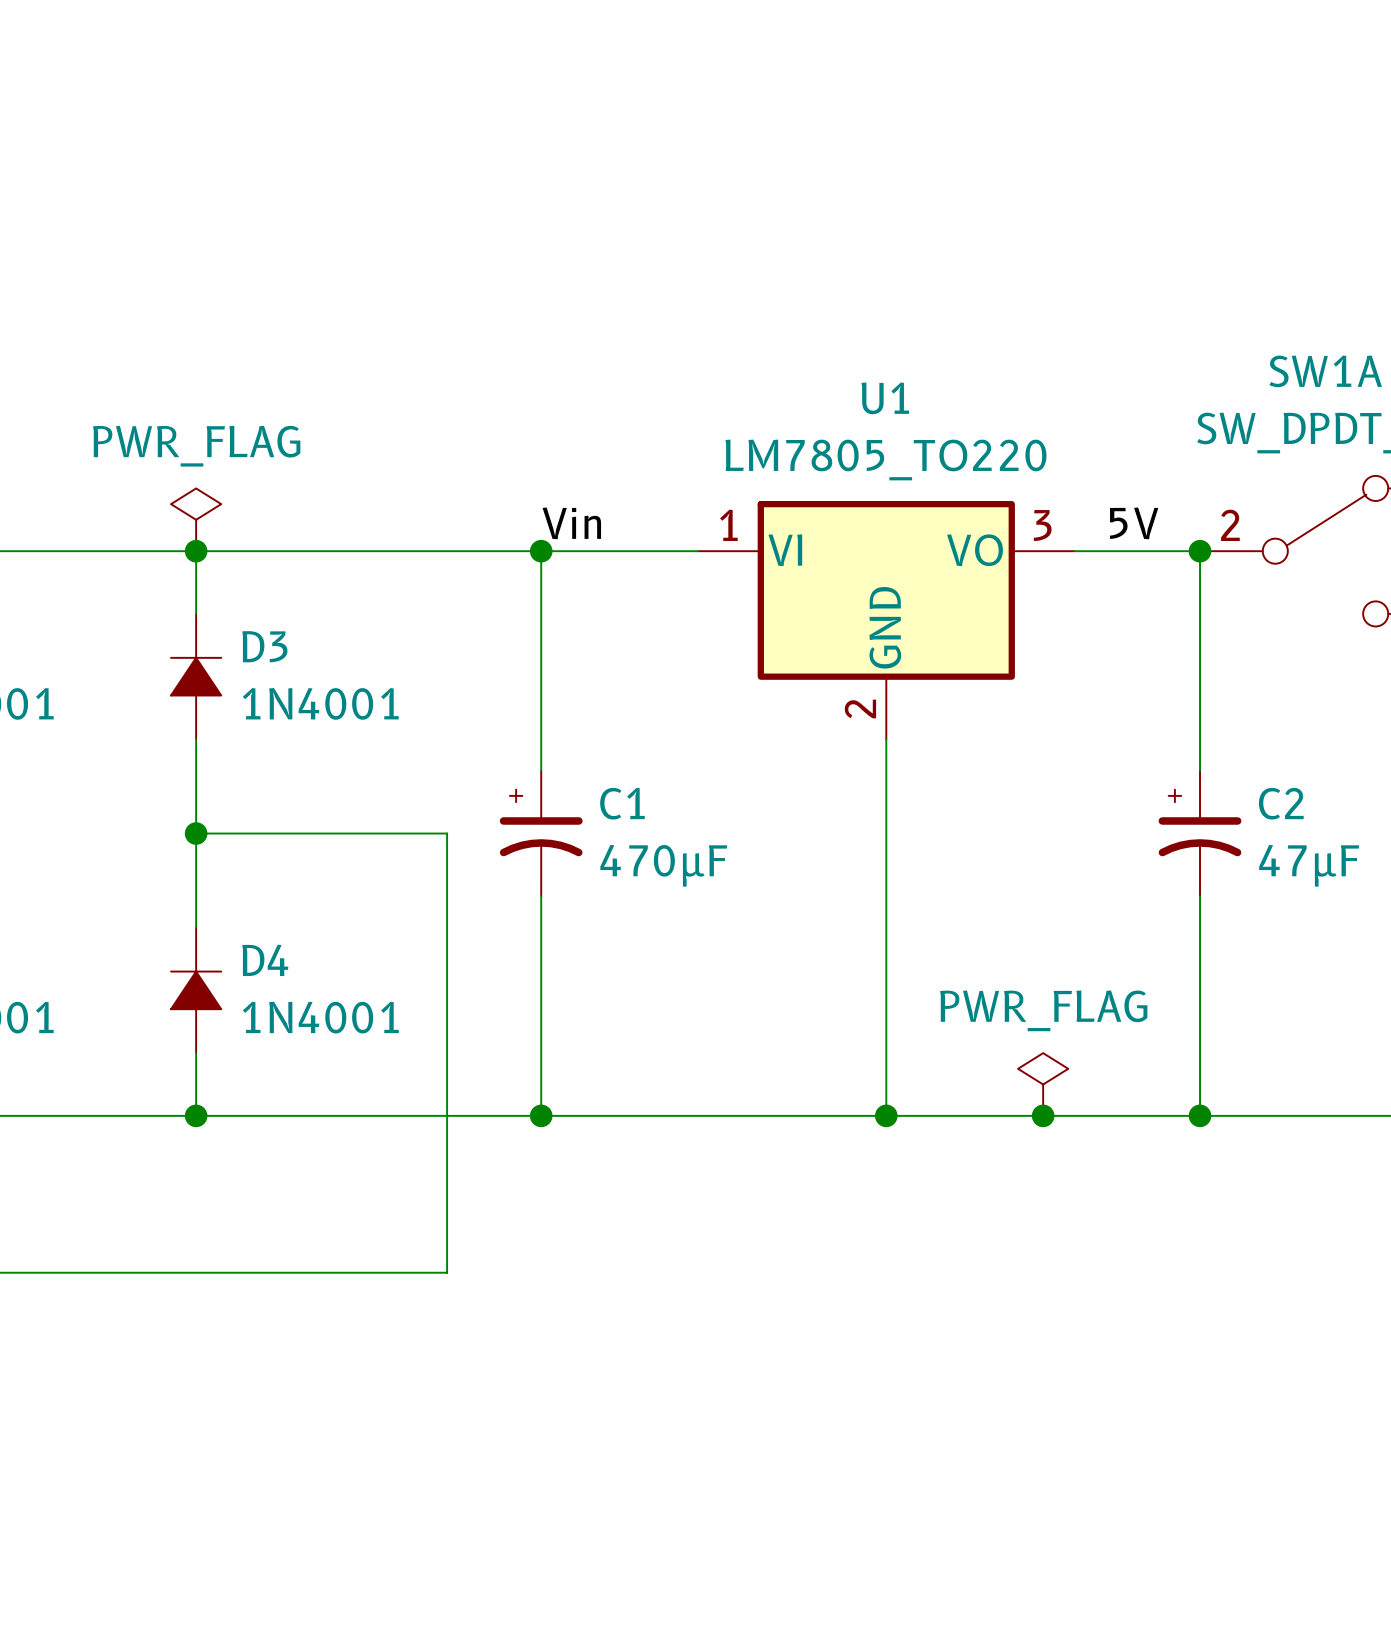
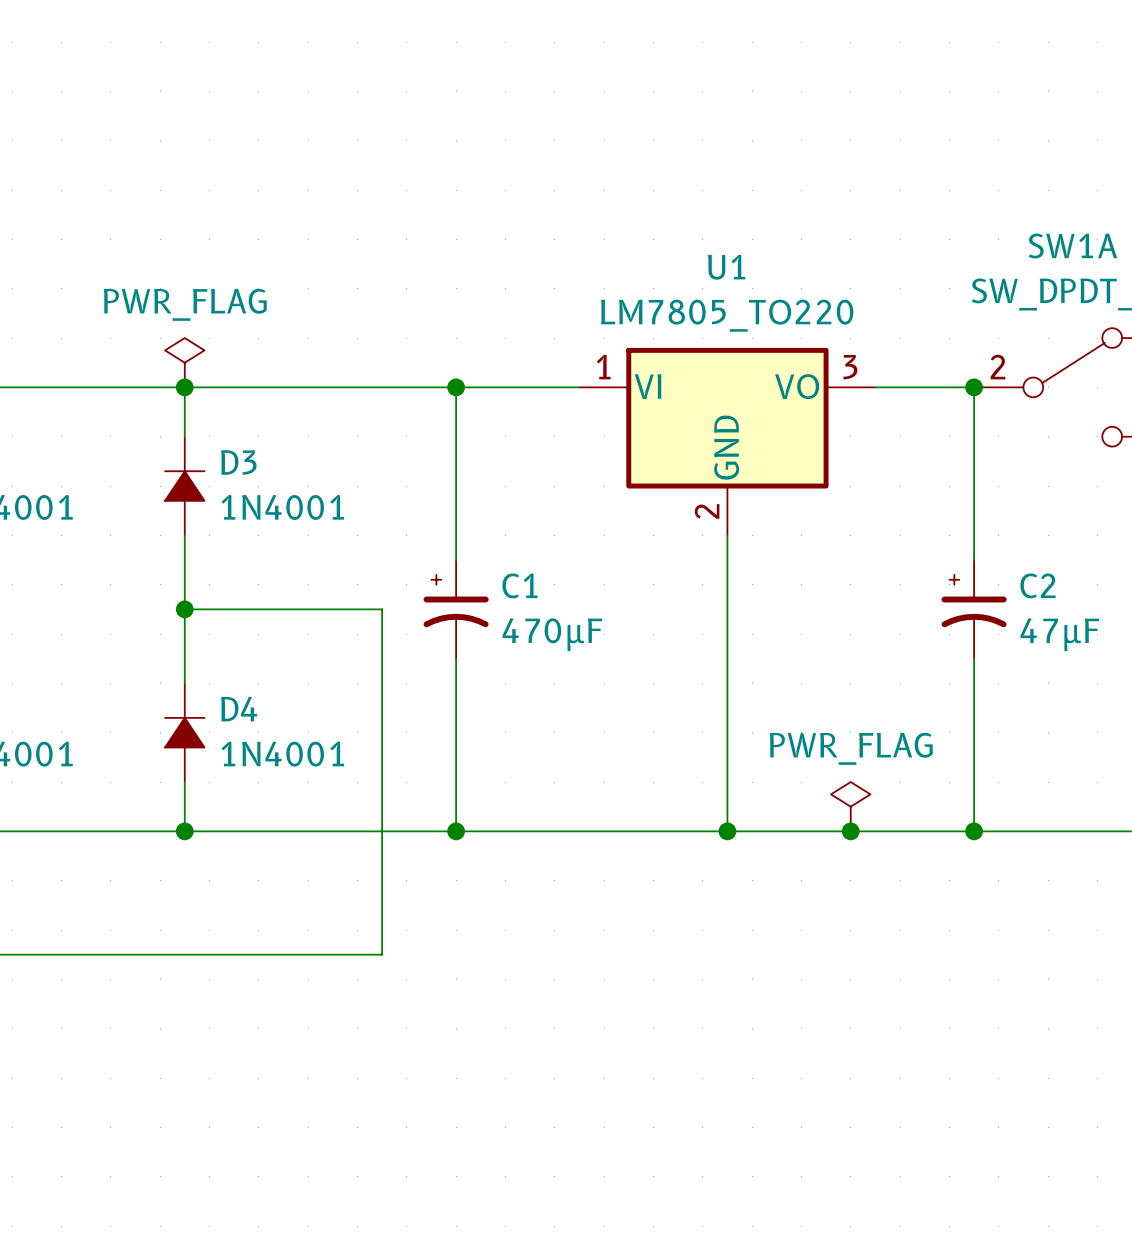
label: Vin (571, 523) -> none
label: 5V (1134, 523) -> none

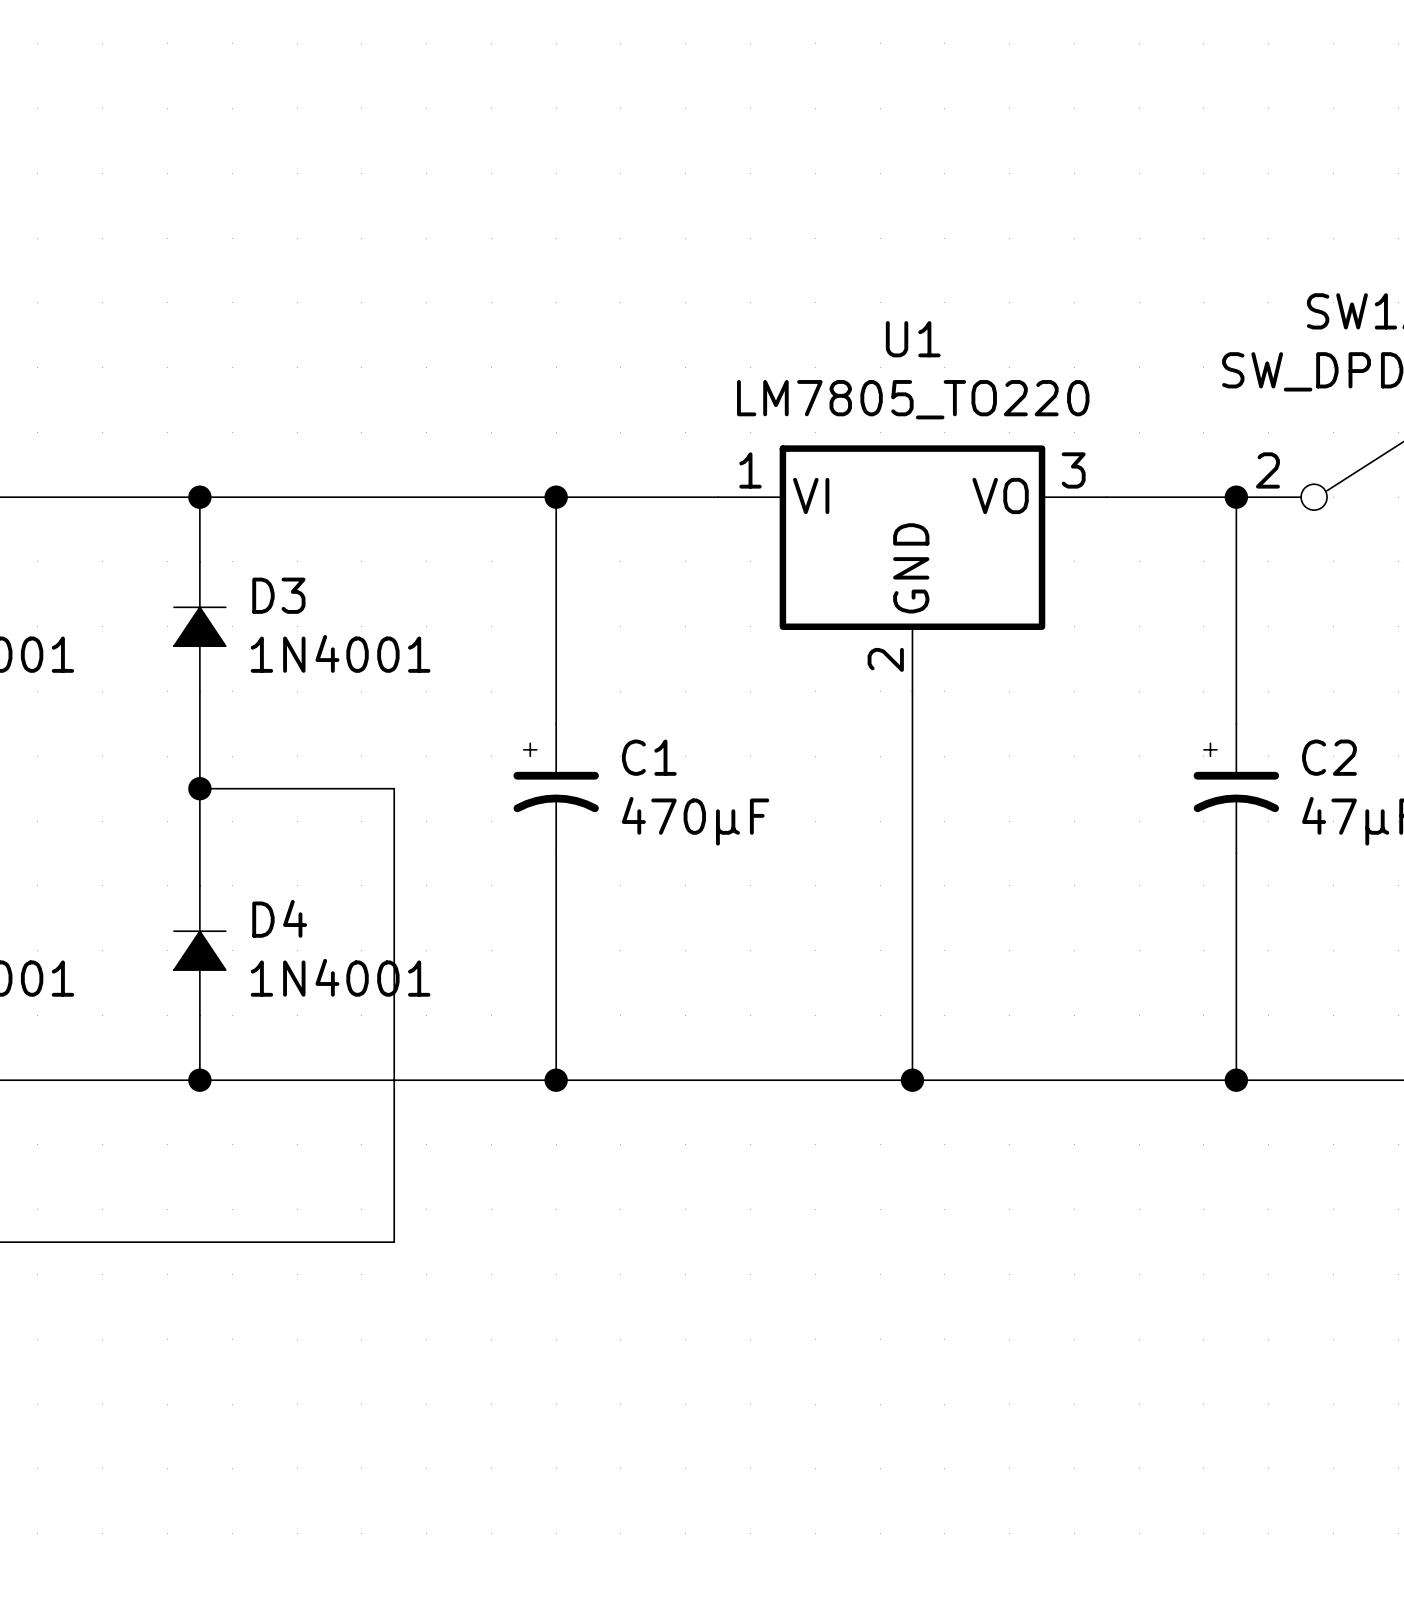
power symbol: PWR_FLAG (184, 362) -> none
wire: (332, 609) (382, 609) (382, 954) (332, 954) -> (394, 788) (394, 1242)
power symbol: PWR_FLAG (850, 806) -> none
junction: (850, 831) -> none

